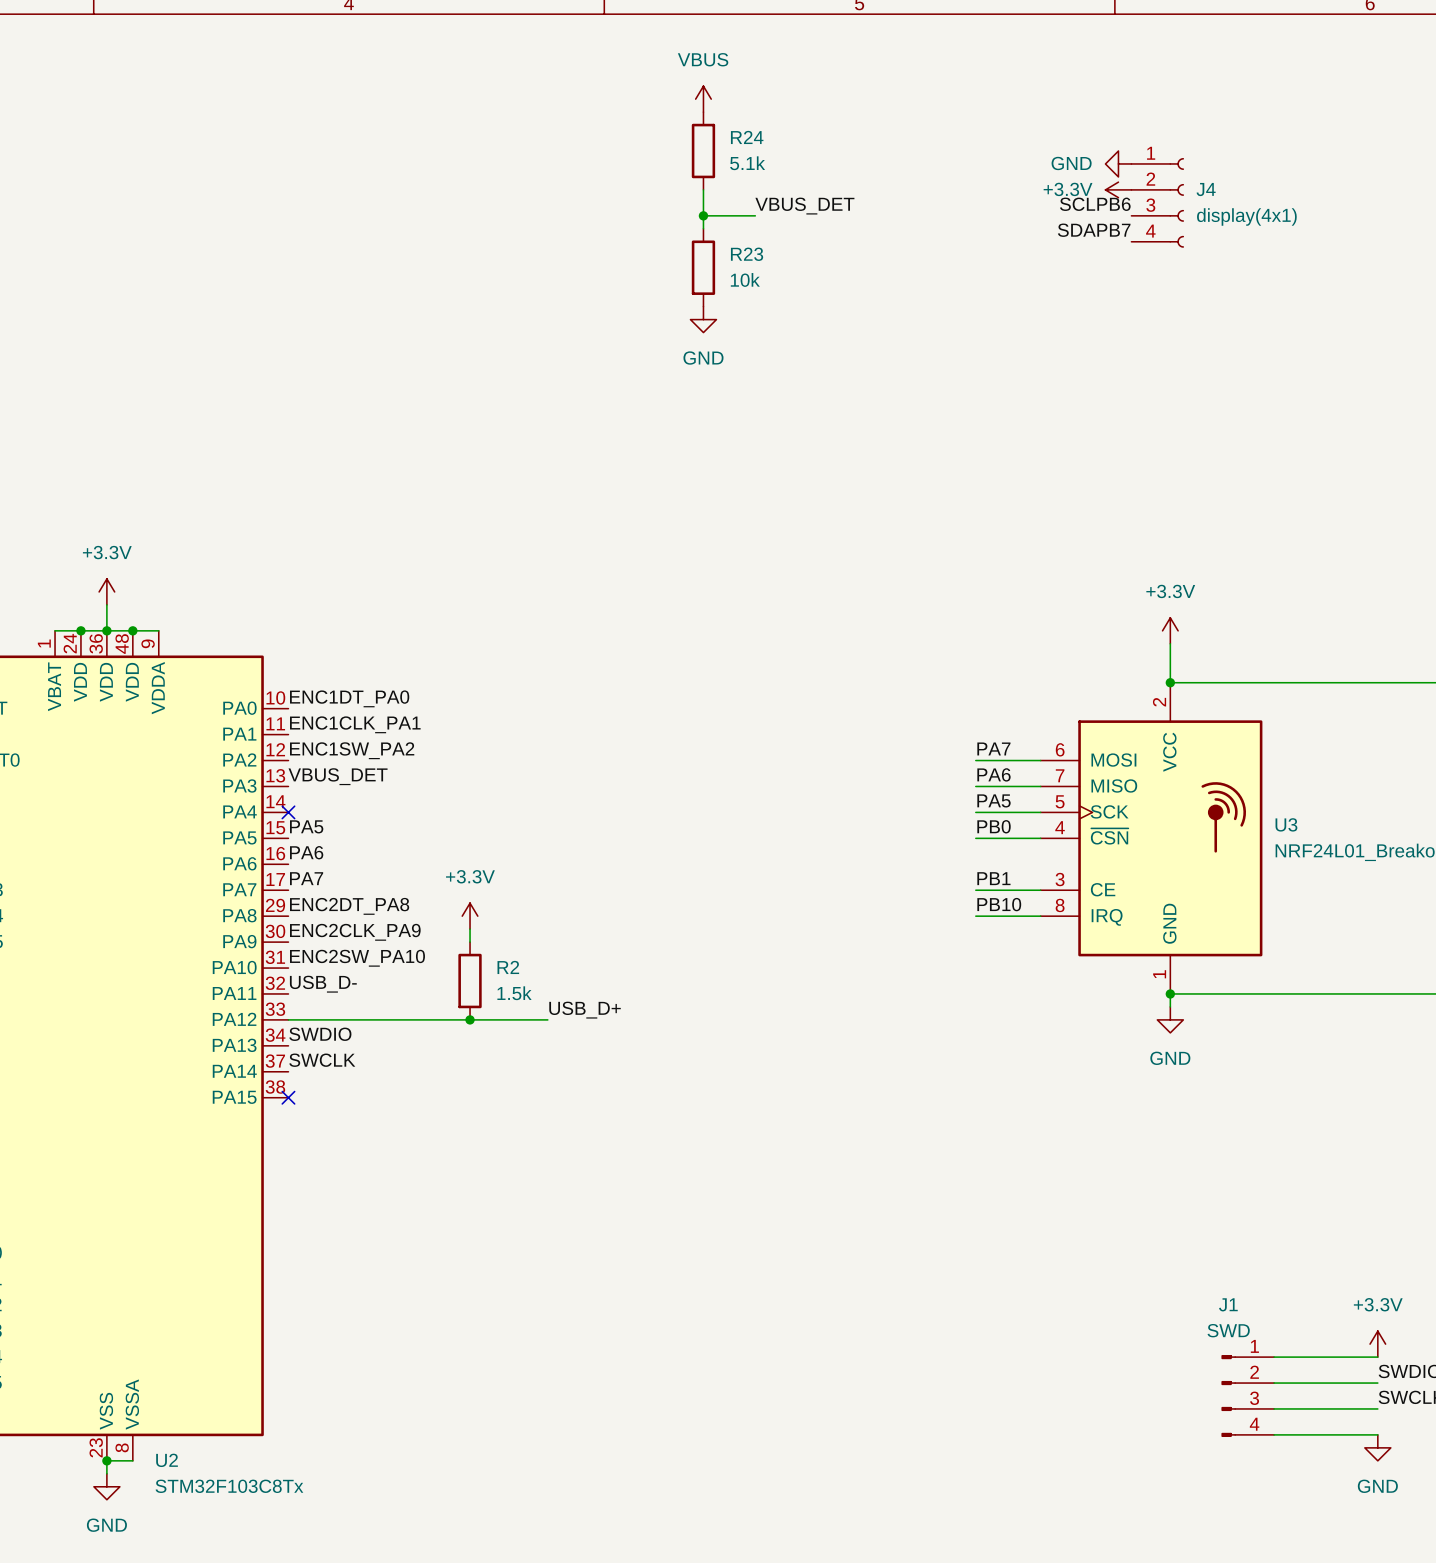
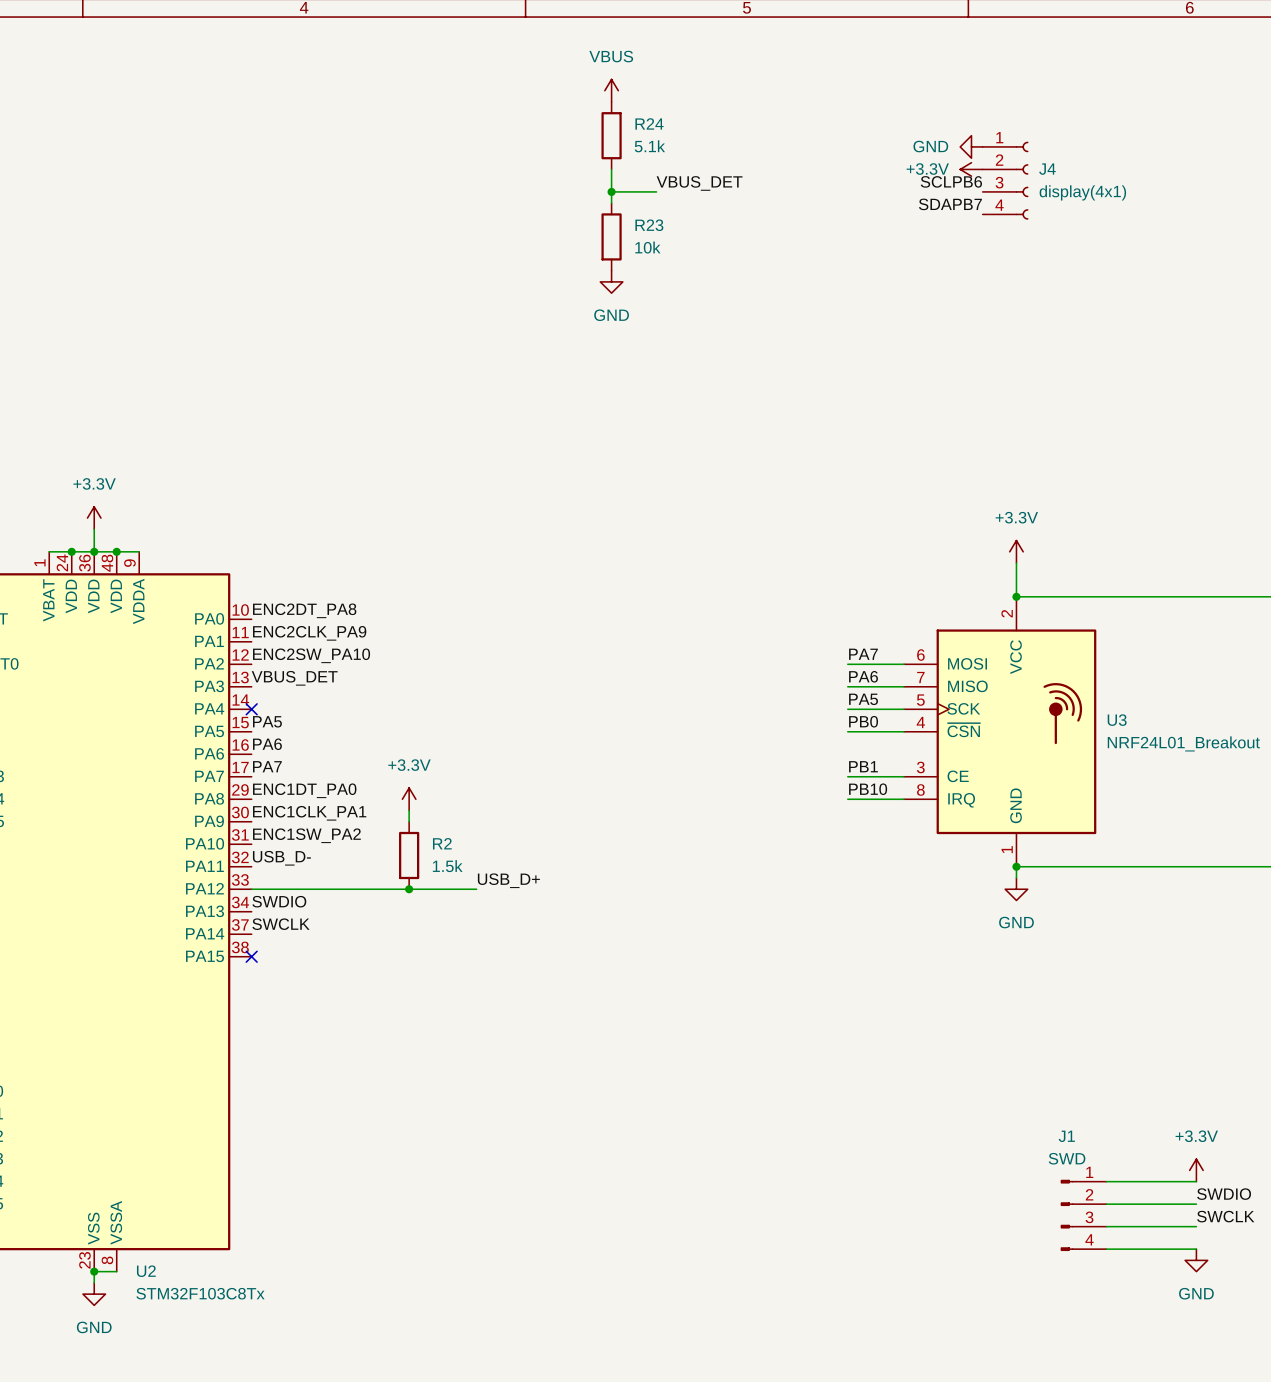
label: ENC1DT_PA0 (349, 698) -> ENC2DT_PA8 (304, 610)
label: ENC1CLK_PA1 (355, 724) -> ENC2CLK_PA9 (309, 633)
label: ENC1SW_PA2 (352, 750) -> ENC2SW_PA10 (311, 655)
label: ENC2DT_PA8 (349, 906) -> ENC1DT_PA0 (304, 790)
label: ENC2CLK_PA9 (355, 932) -> ENC1CLK_PA1 (309, 813)
label: ENC2SW_PA10 (357, 958) -> ENC1SW_PA2 (306, 835)

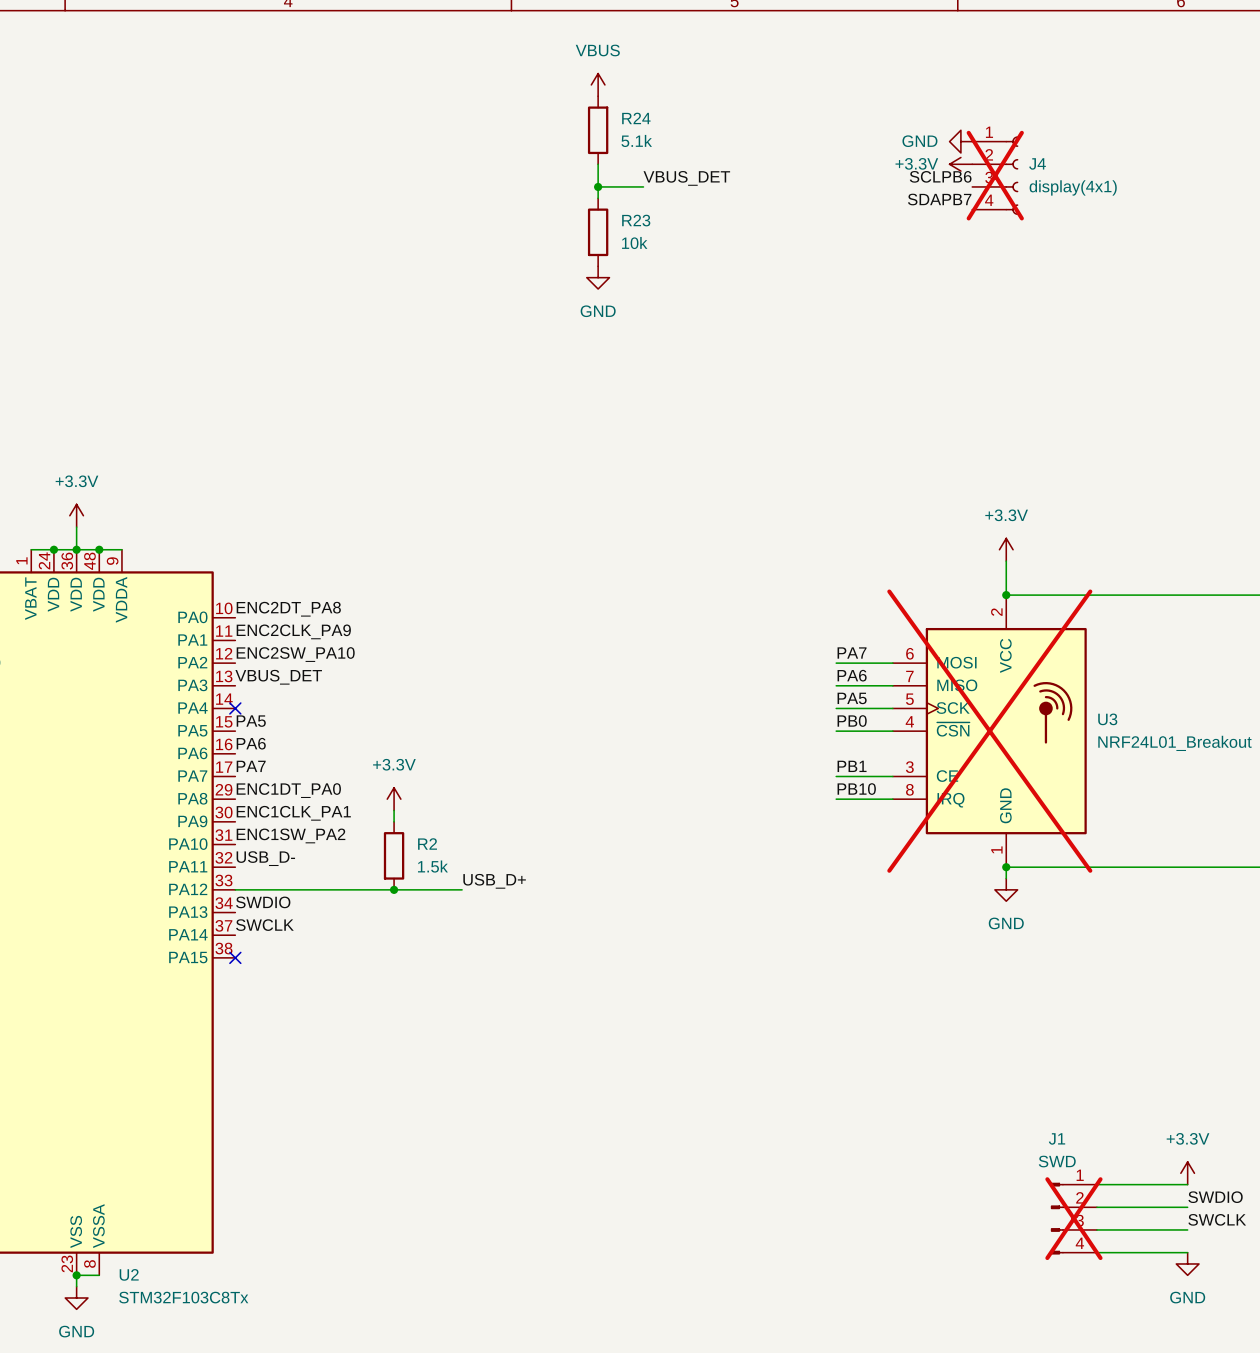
J4 do-not-place cross: none -> (995, 175)
U3 do-not-place cross: none -> (989, 731)
J1 do-not-place cross: none -> (1073, 1218)

